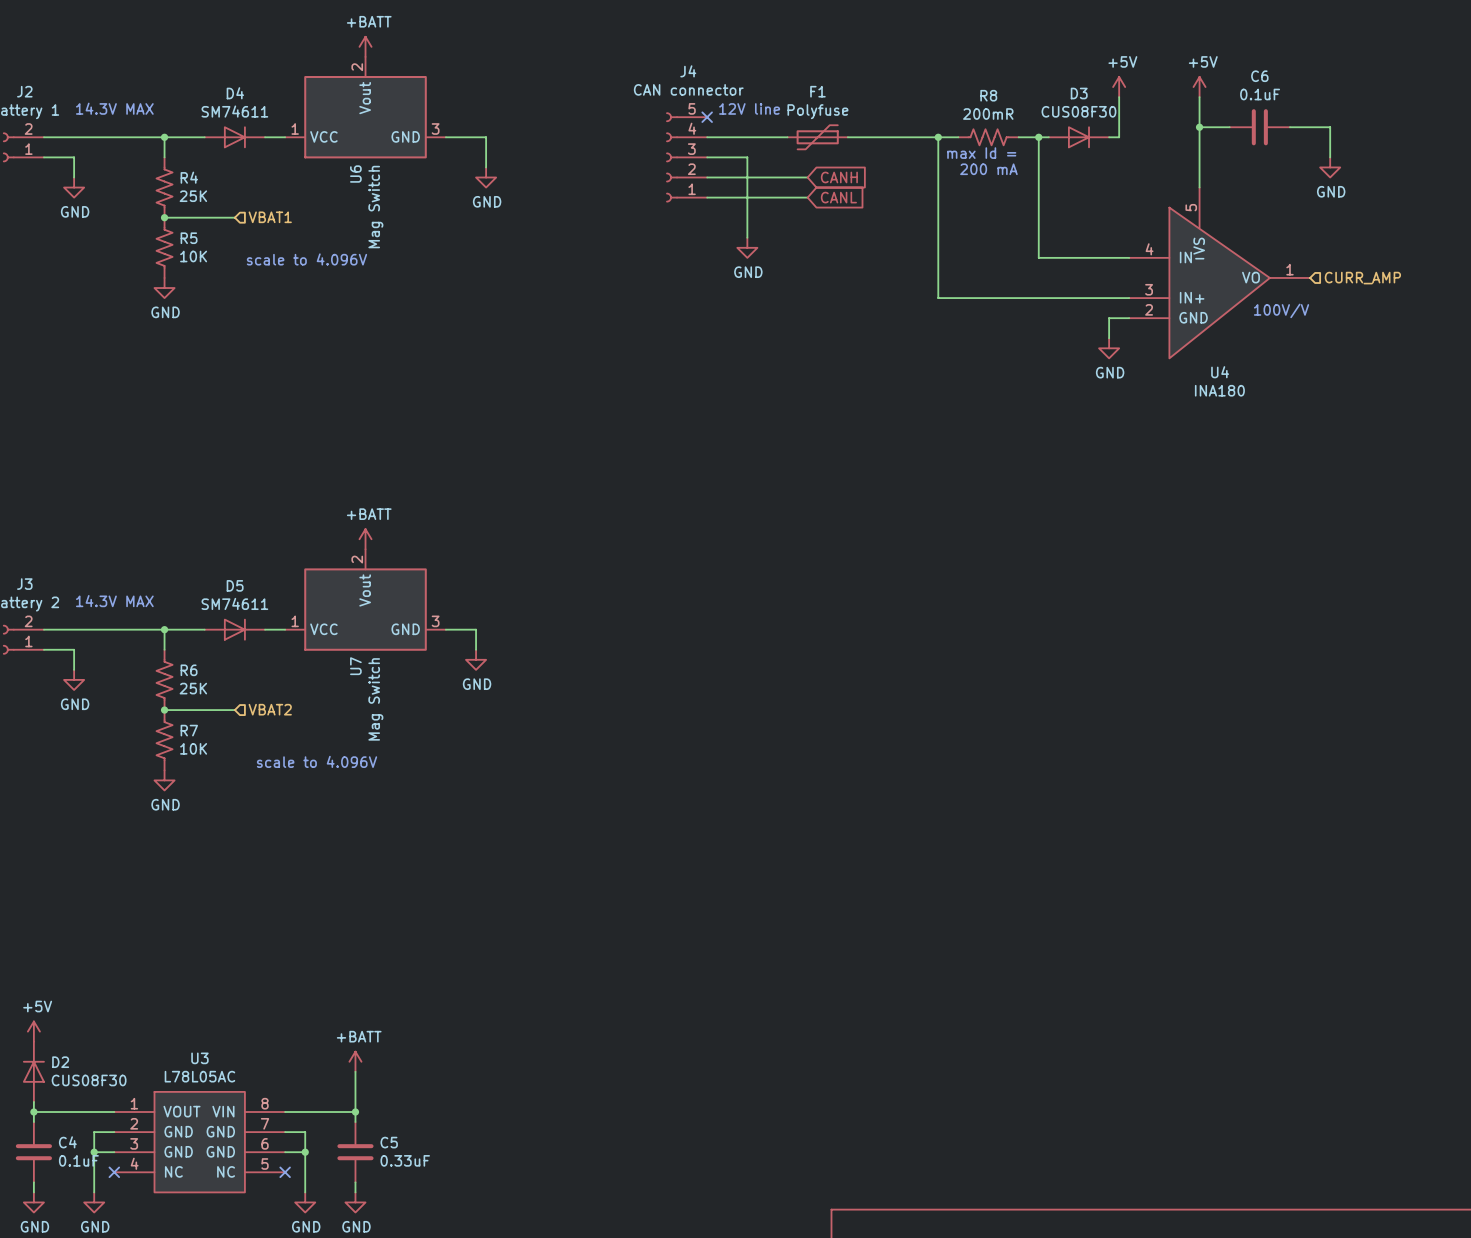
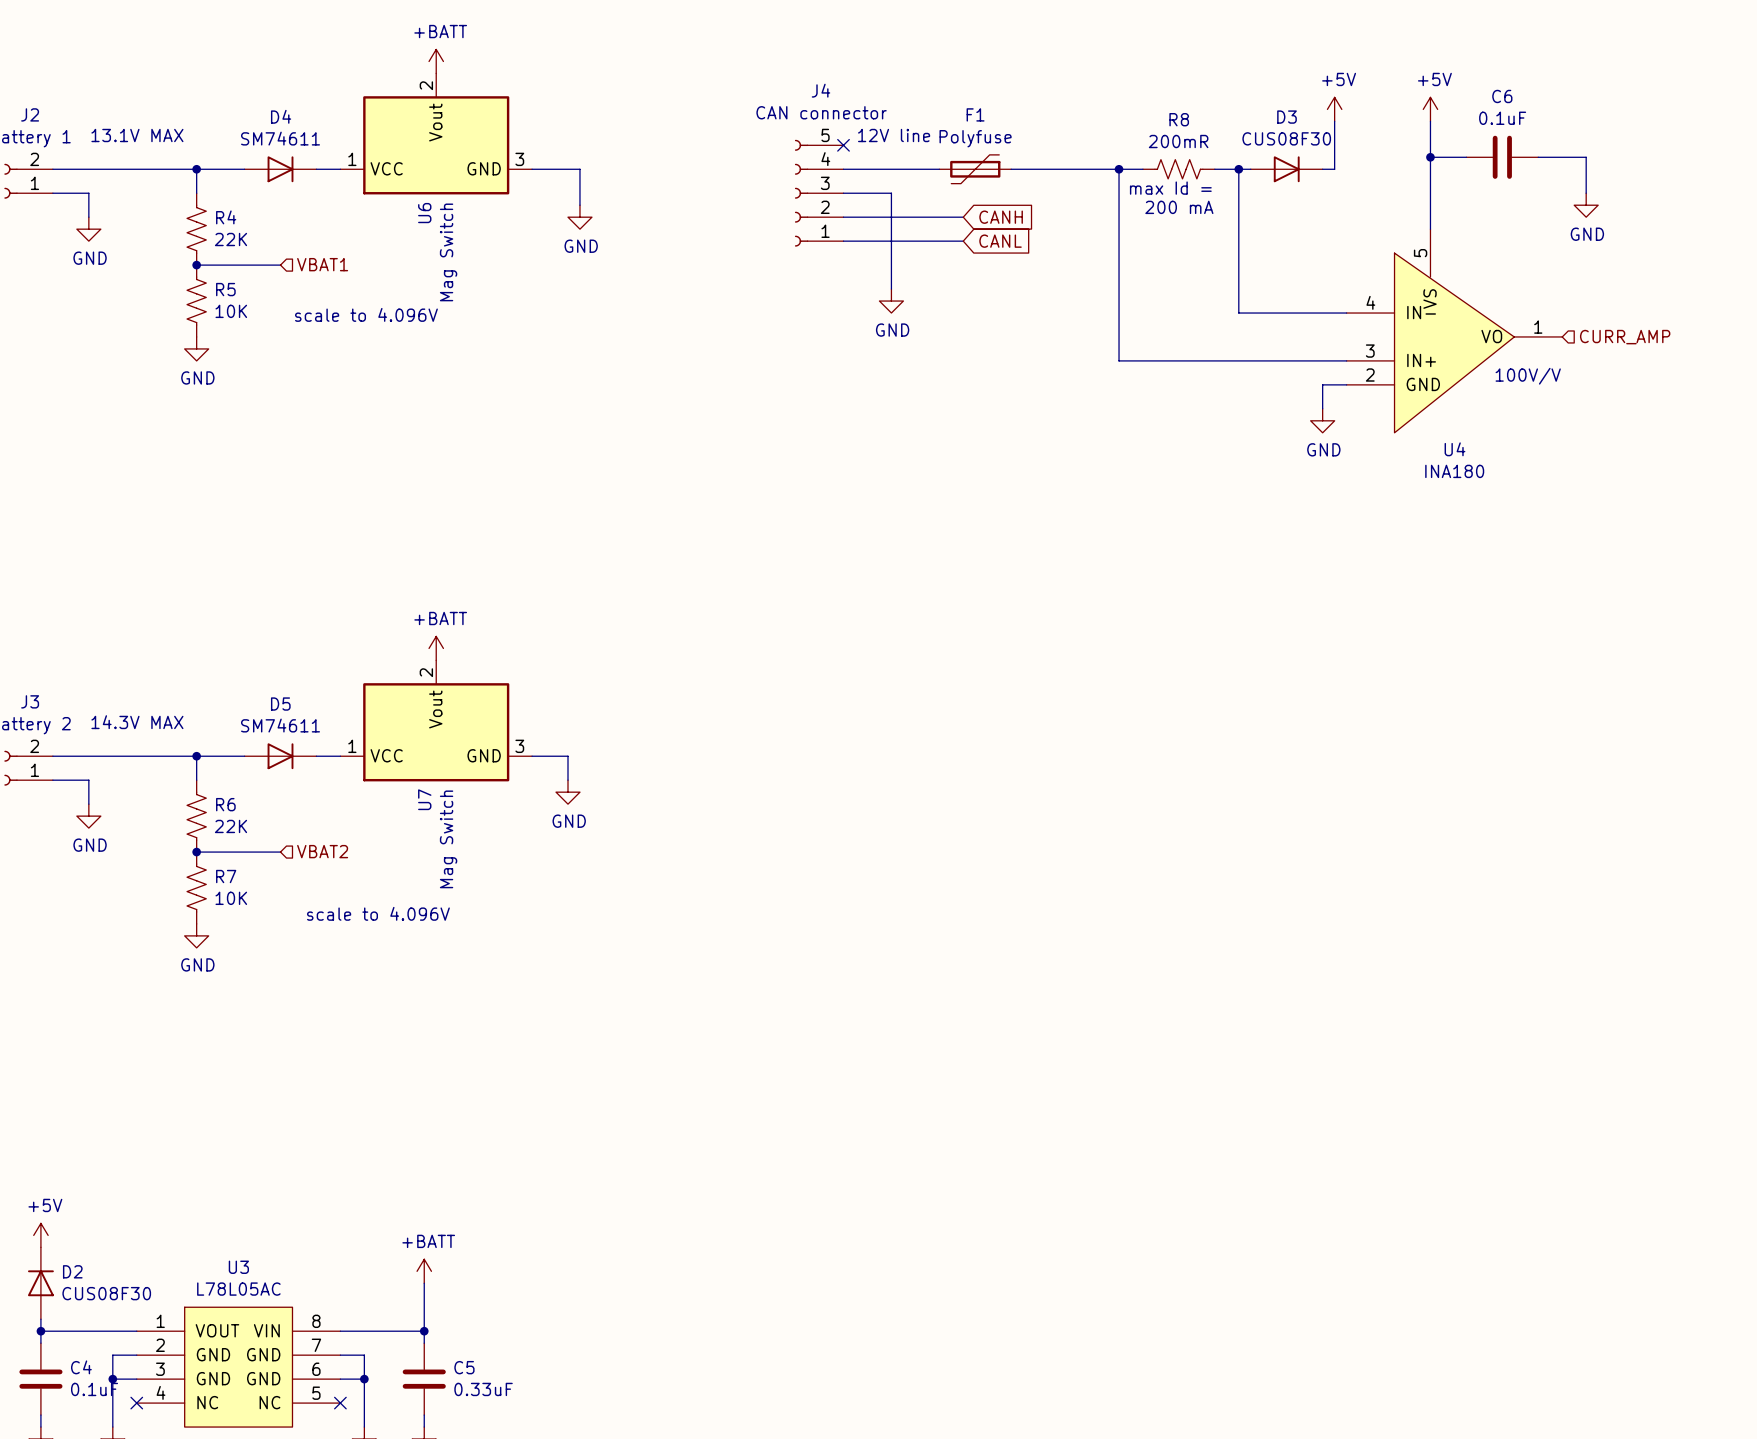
text: 14.3V MAX (114, 108) -> 13.1V MAX (137, 135)
R4 value: 25K (193, 196) -> 22K (231, 239)
R6 value: 25K (193, 688) -> 22K (231, 826)

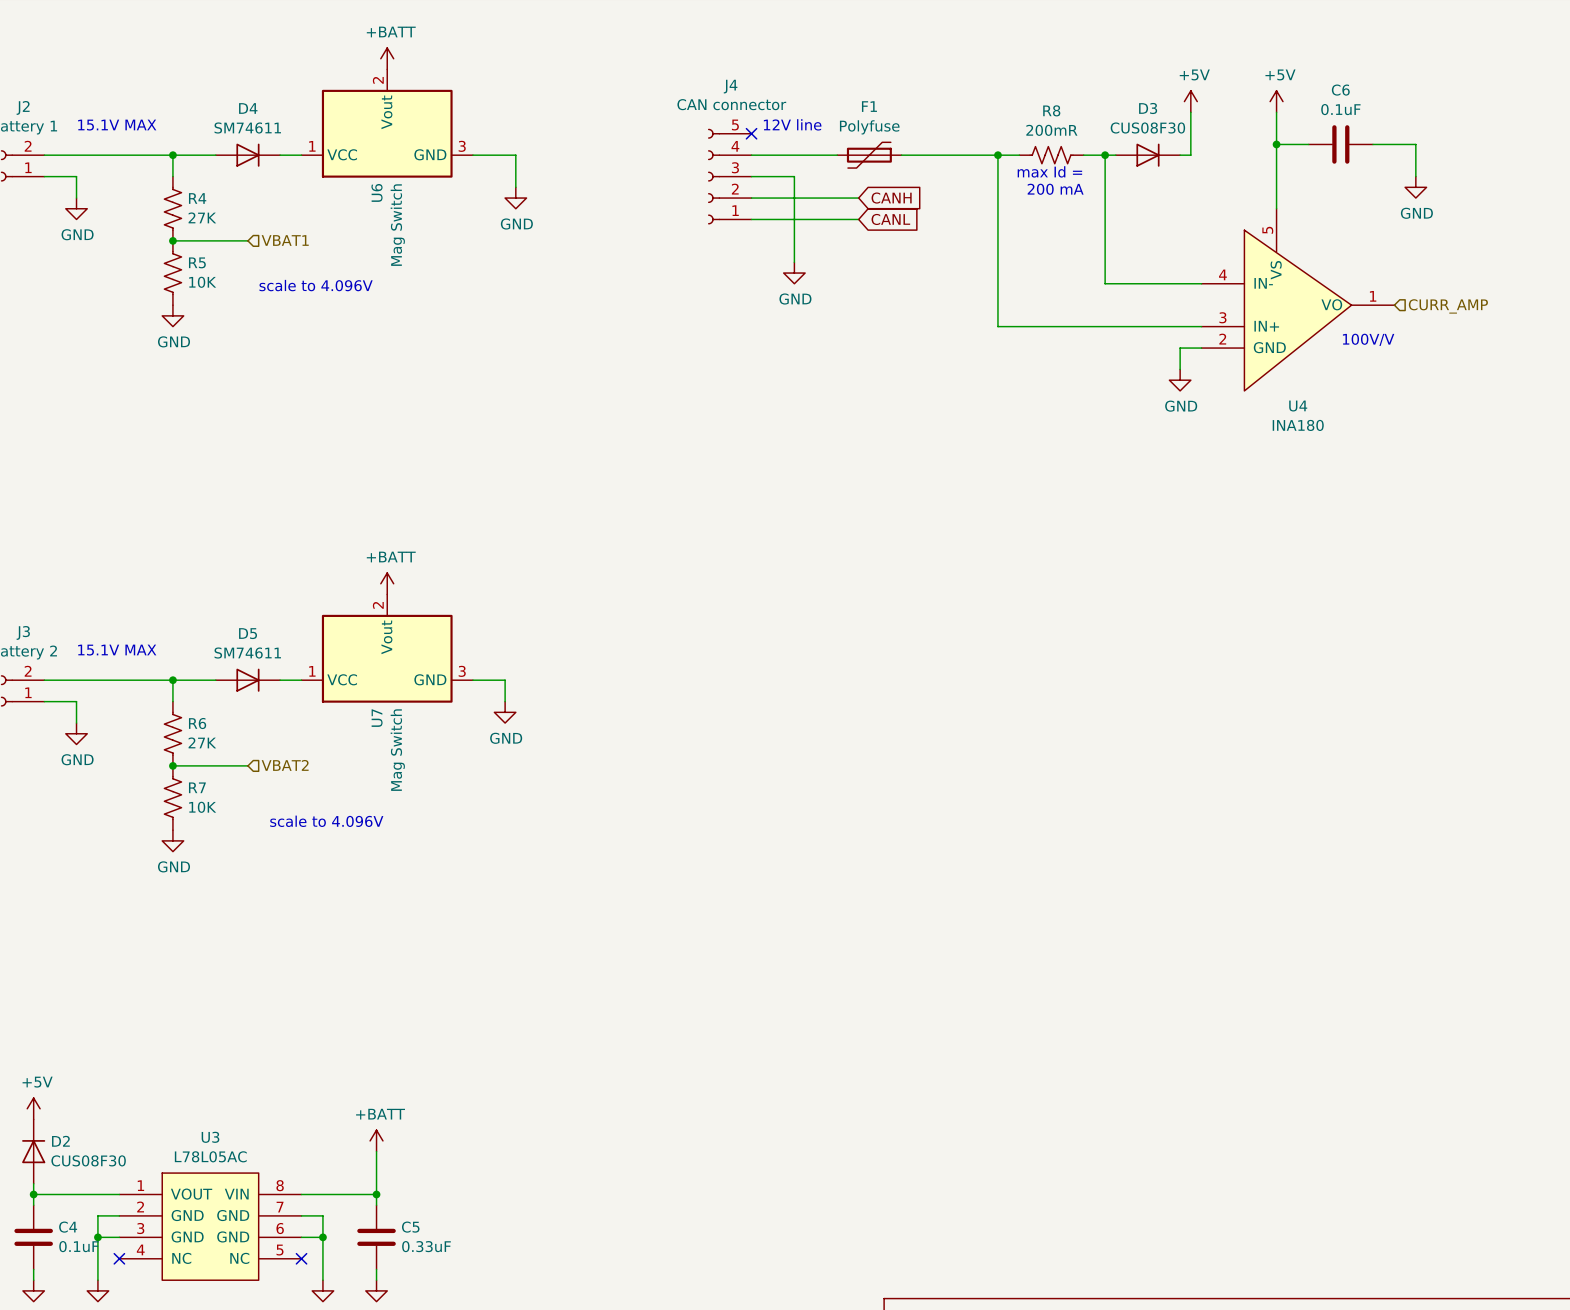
text: 13.1V MAX (137, 135) -> 15.1V MAX (117, 125)
R4 value: 22K (231, 239) -> 27K (202, 217)
text: 14.3V MAX (137, 722) -> 15.1V MAX (117, 650)
R6 value: 22K (231, 826) -> 27K (202, 742)

